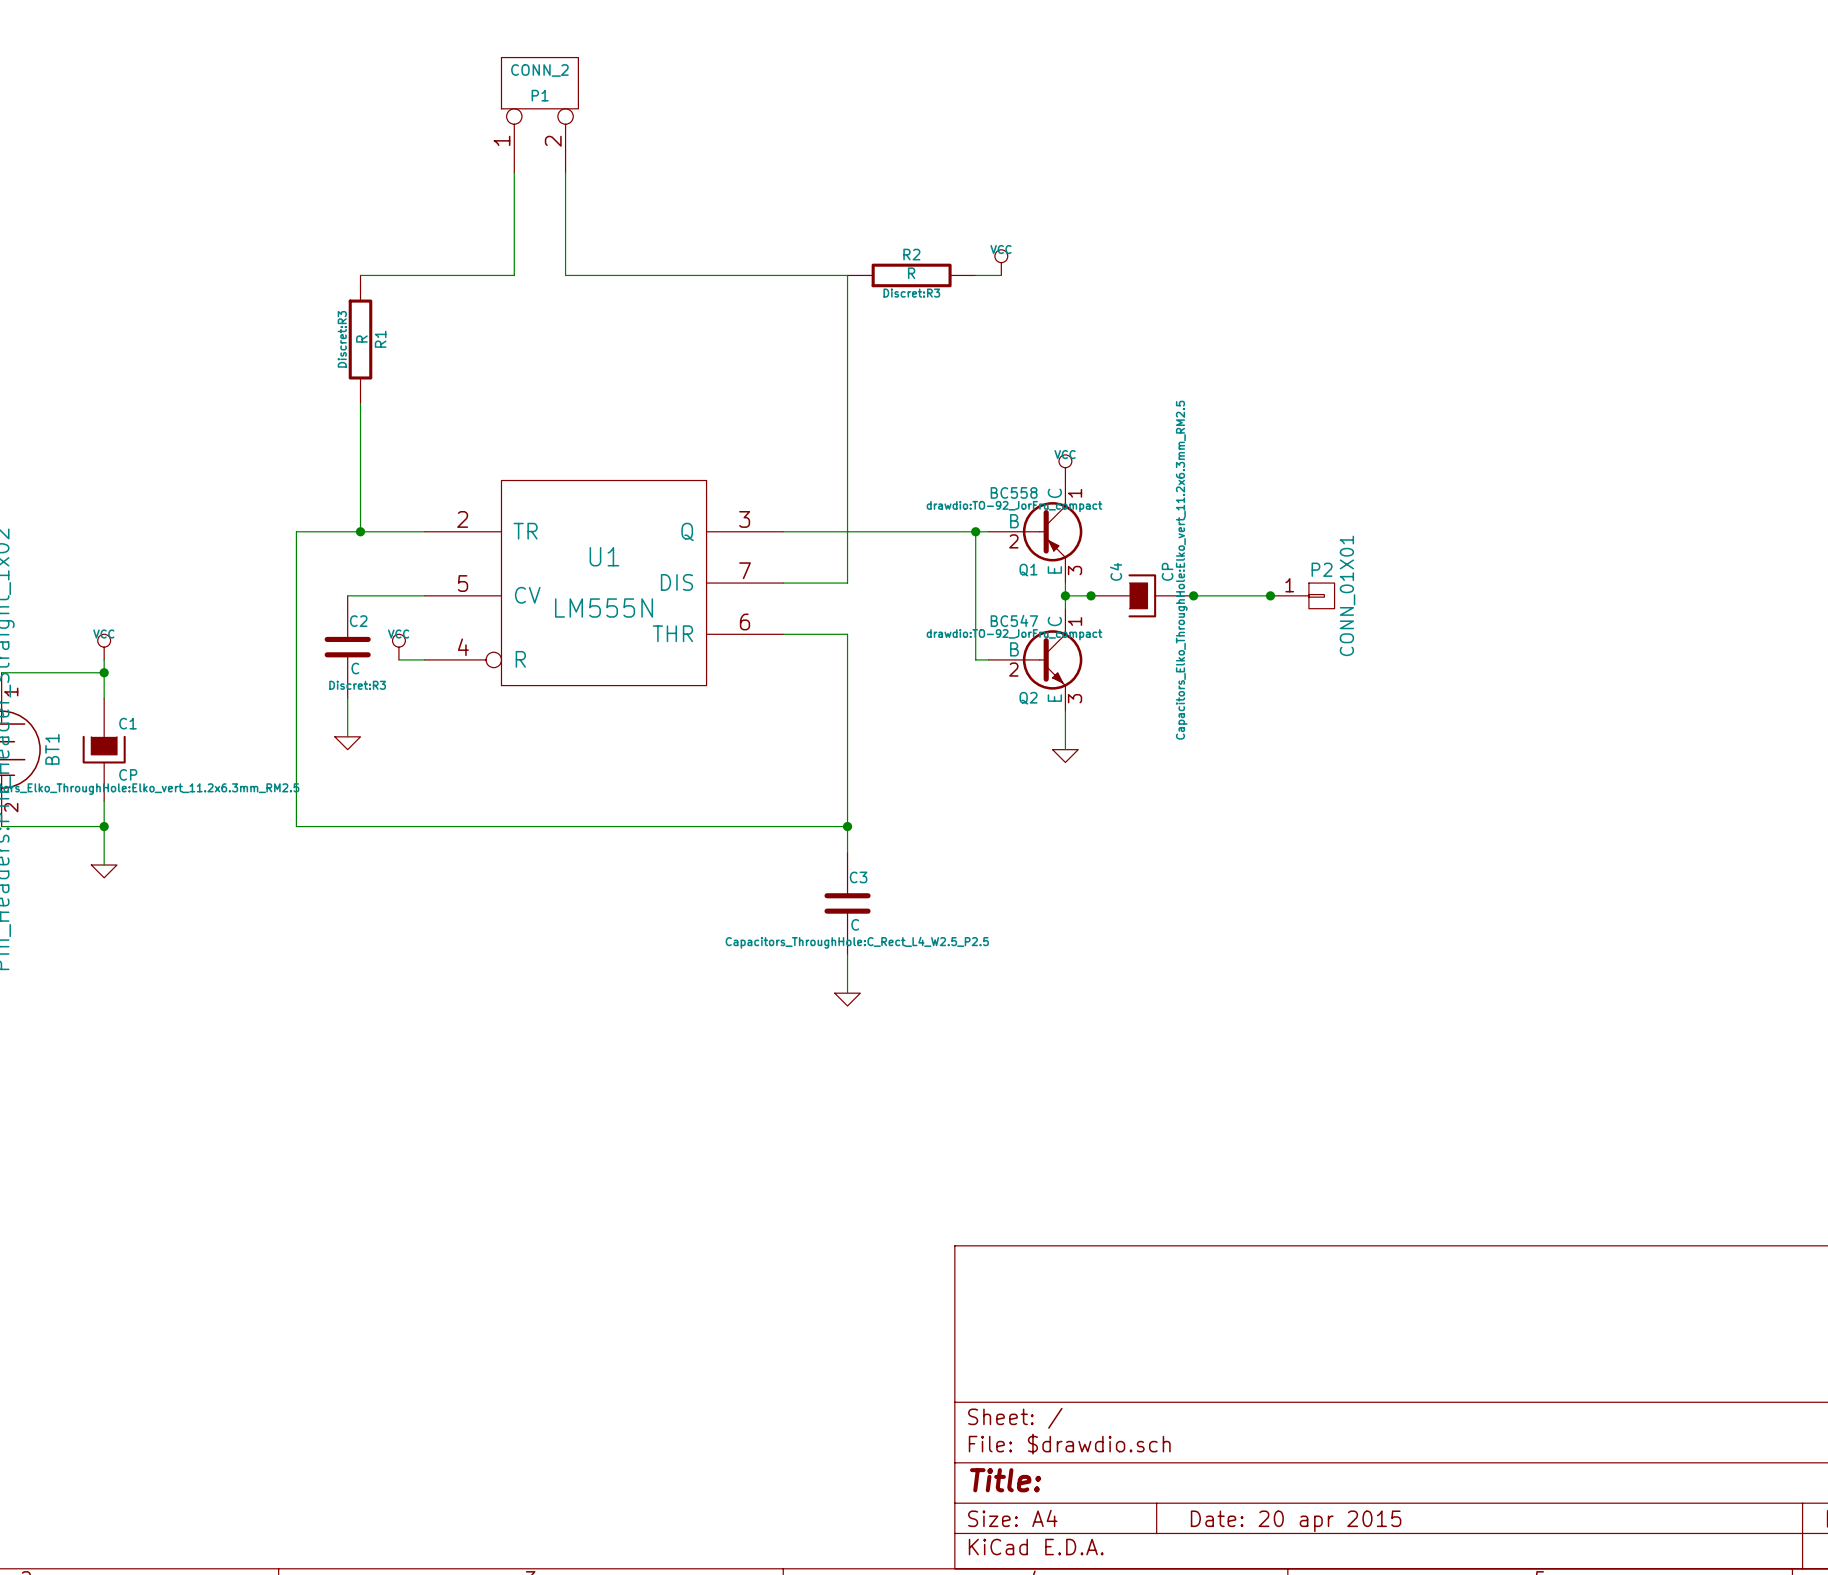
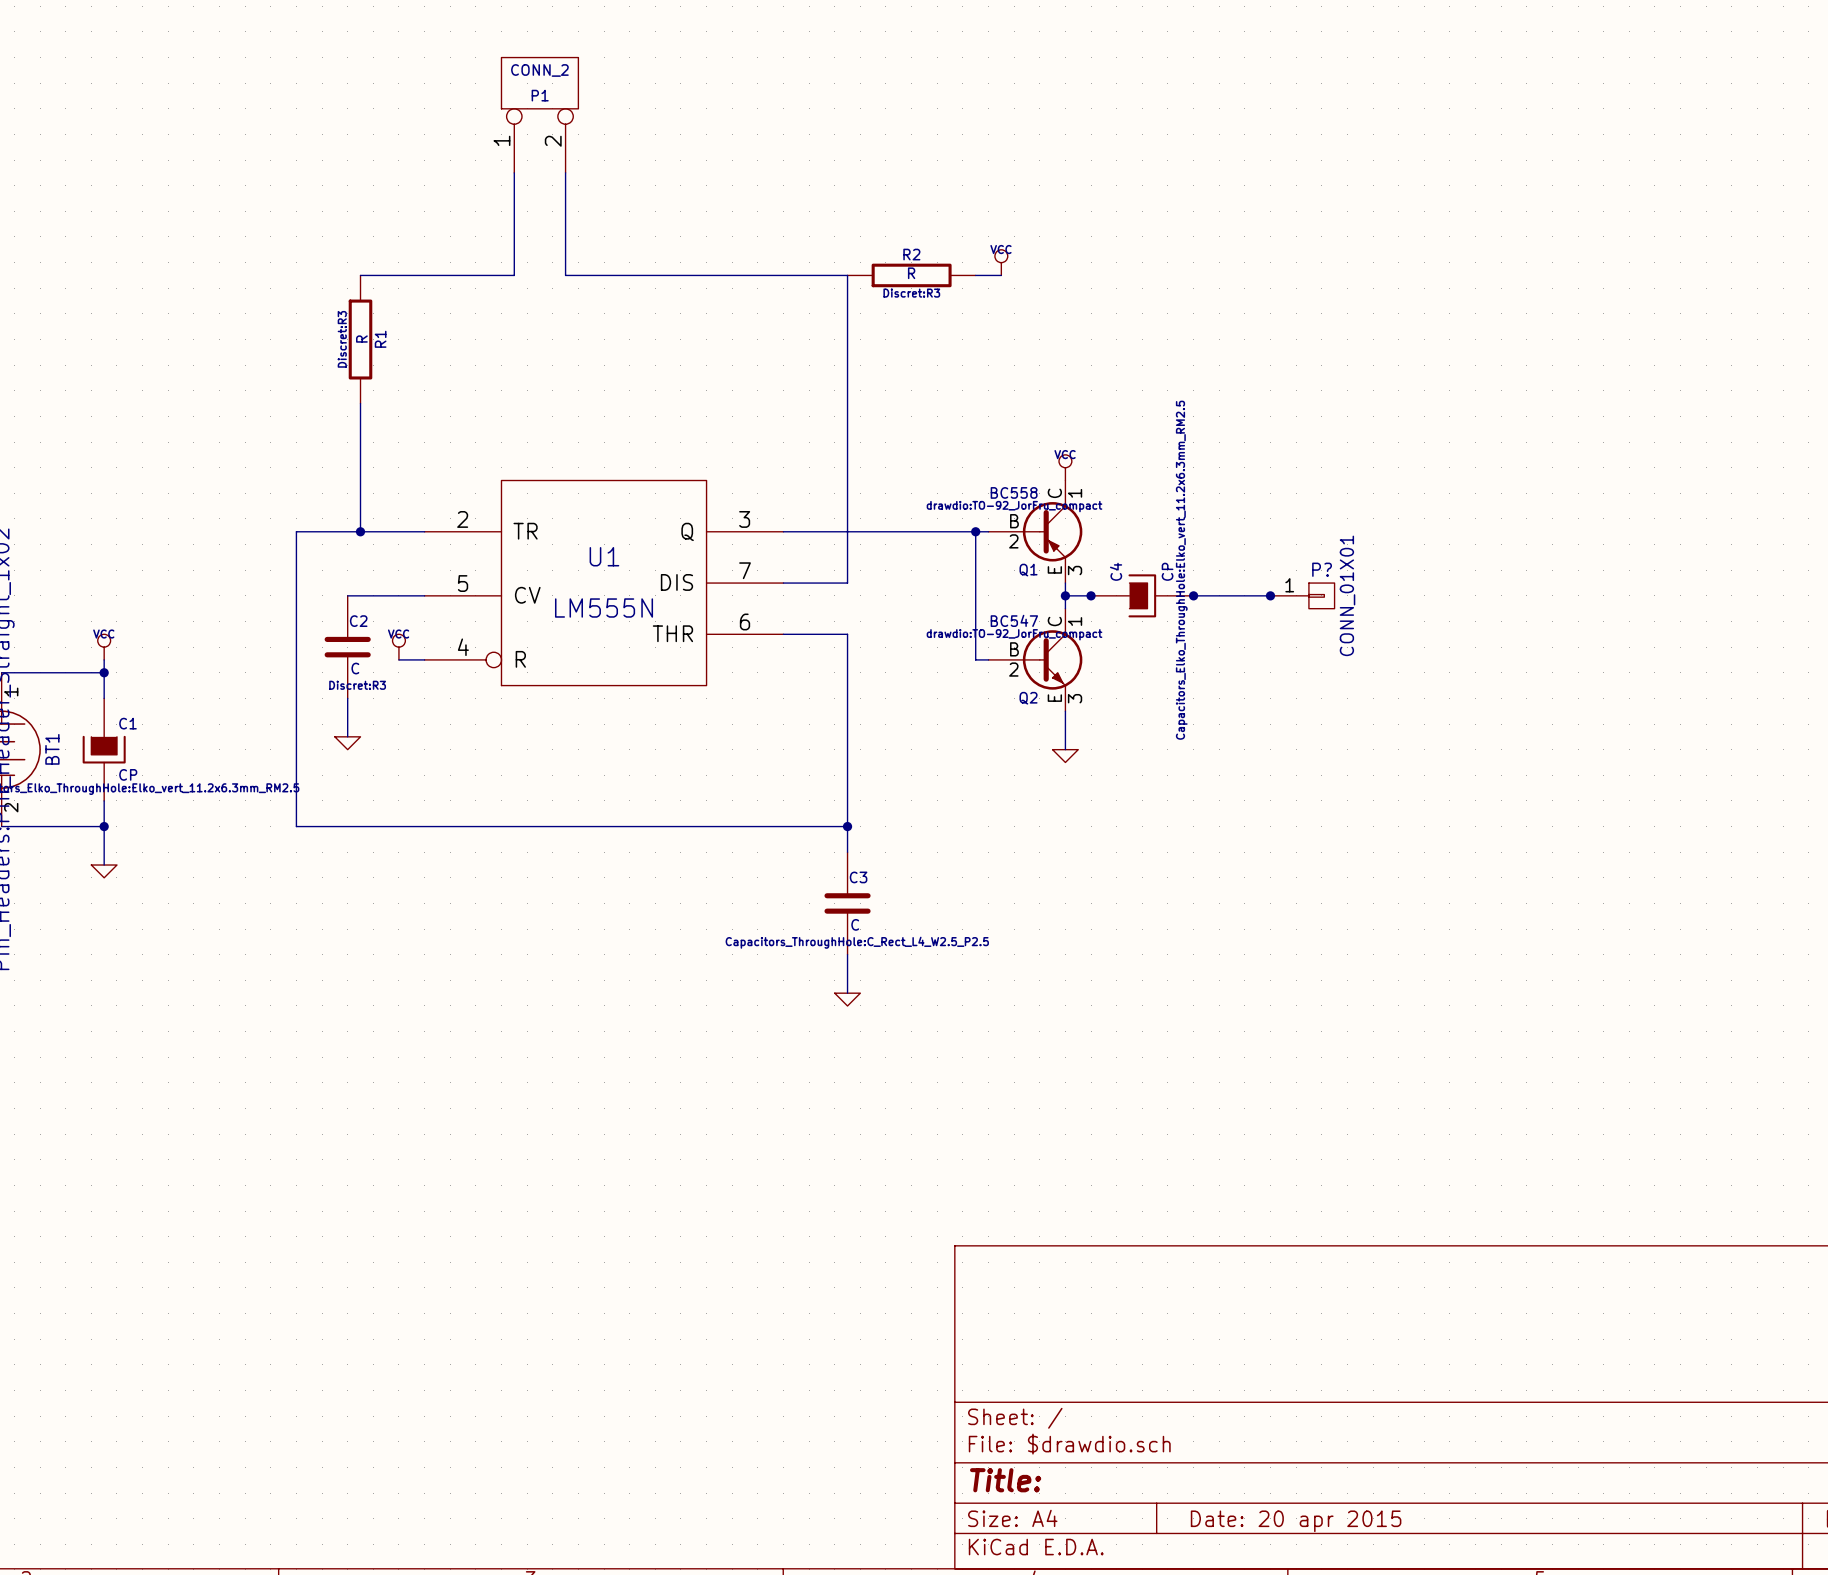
P2 name: P2 (1322, 569) -> P? (1322, 569)

